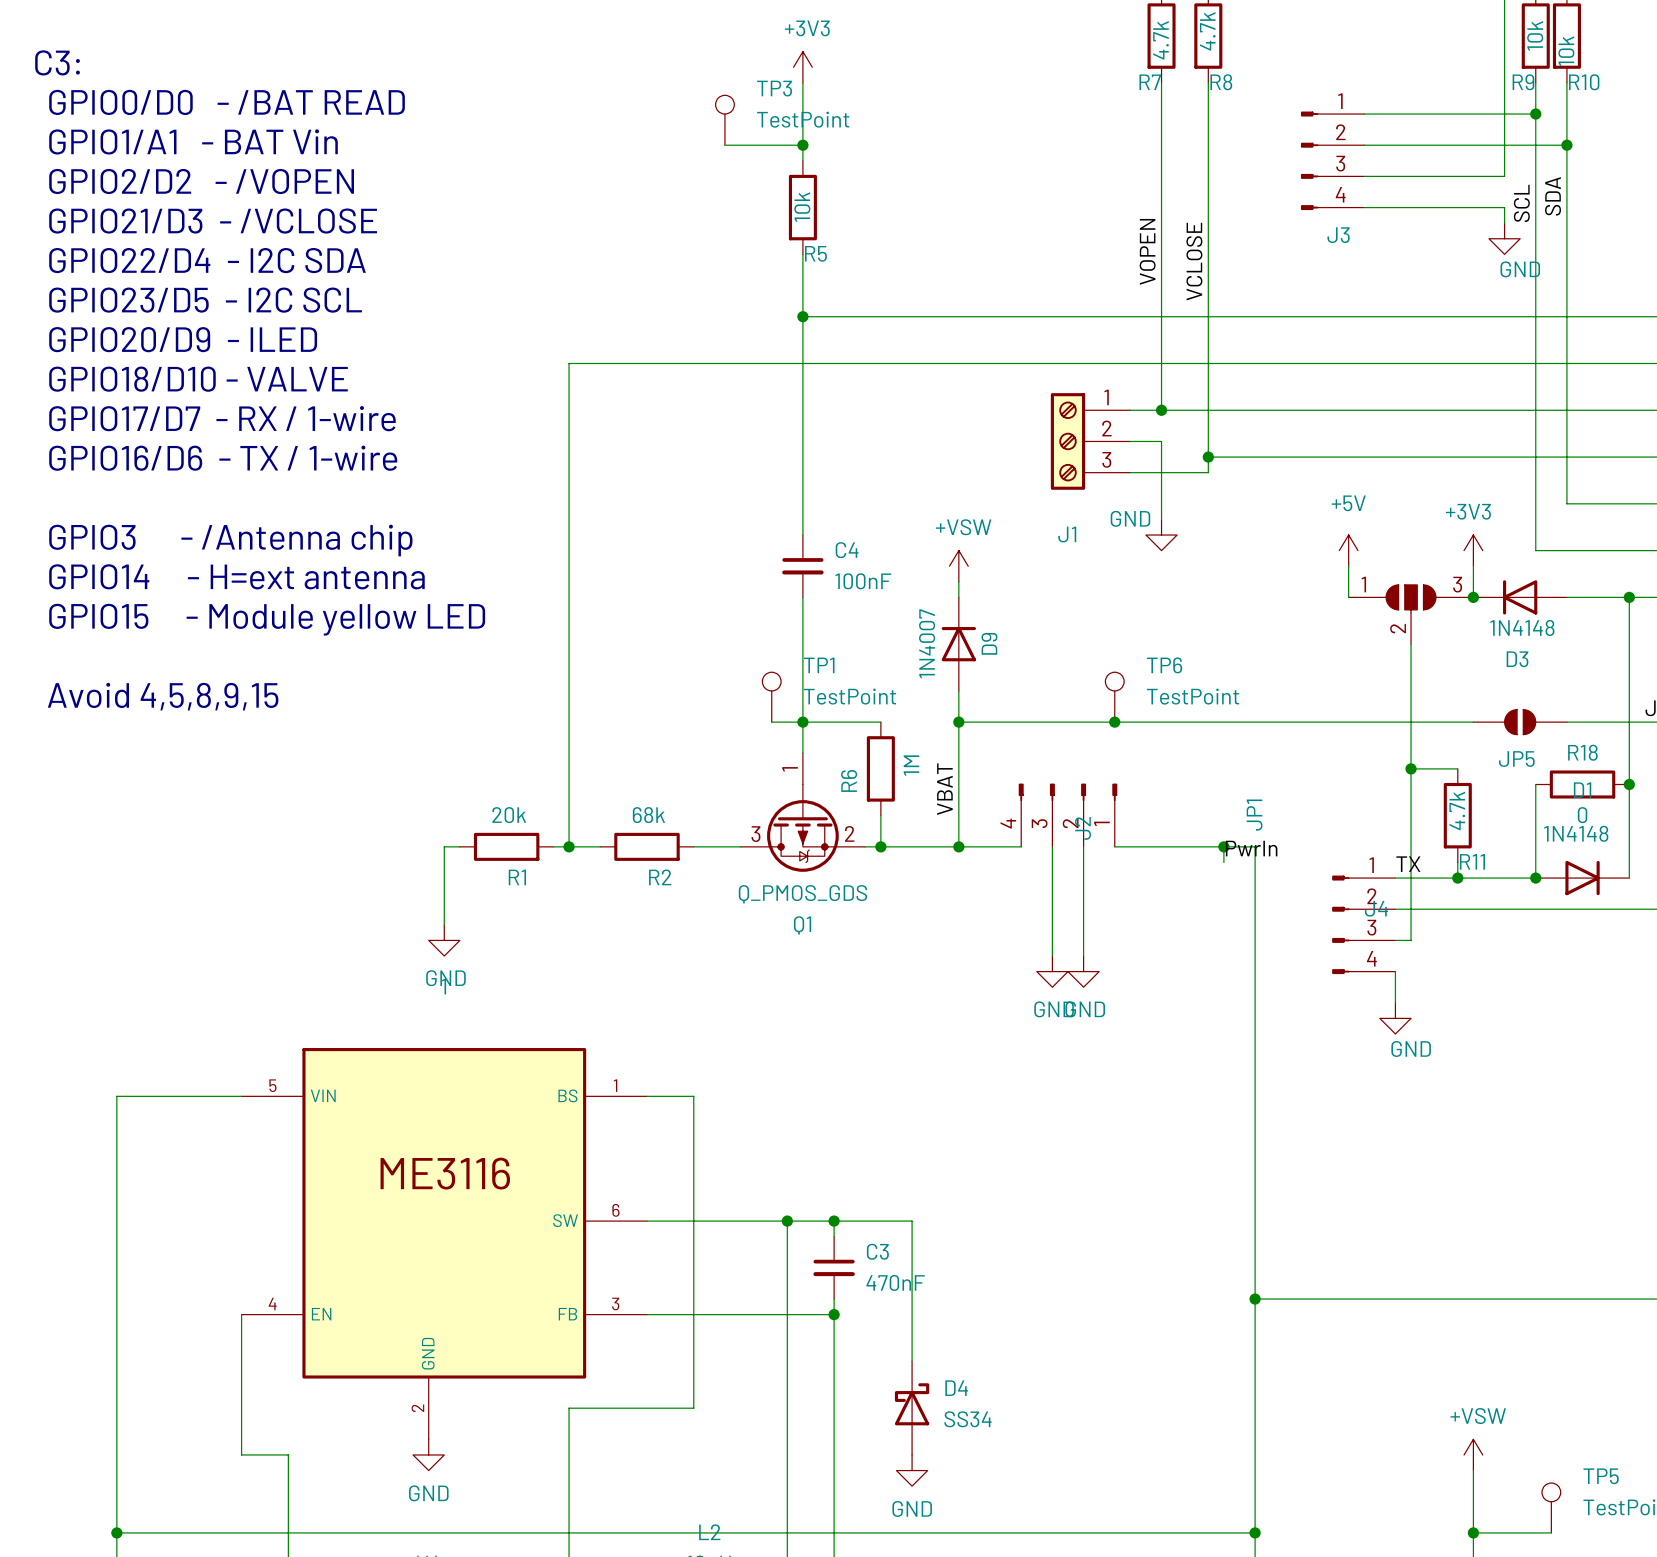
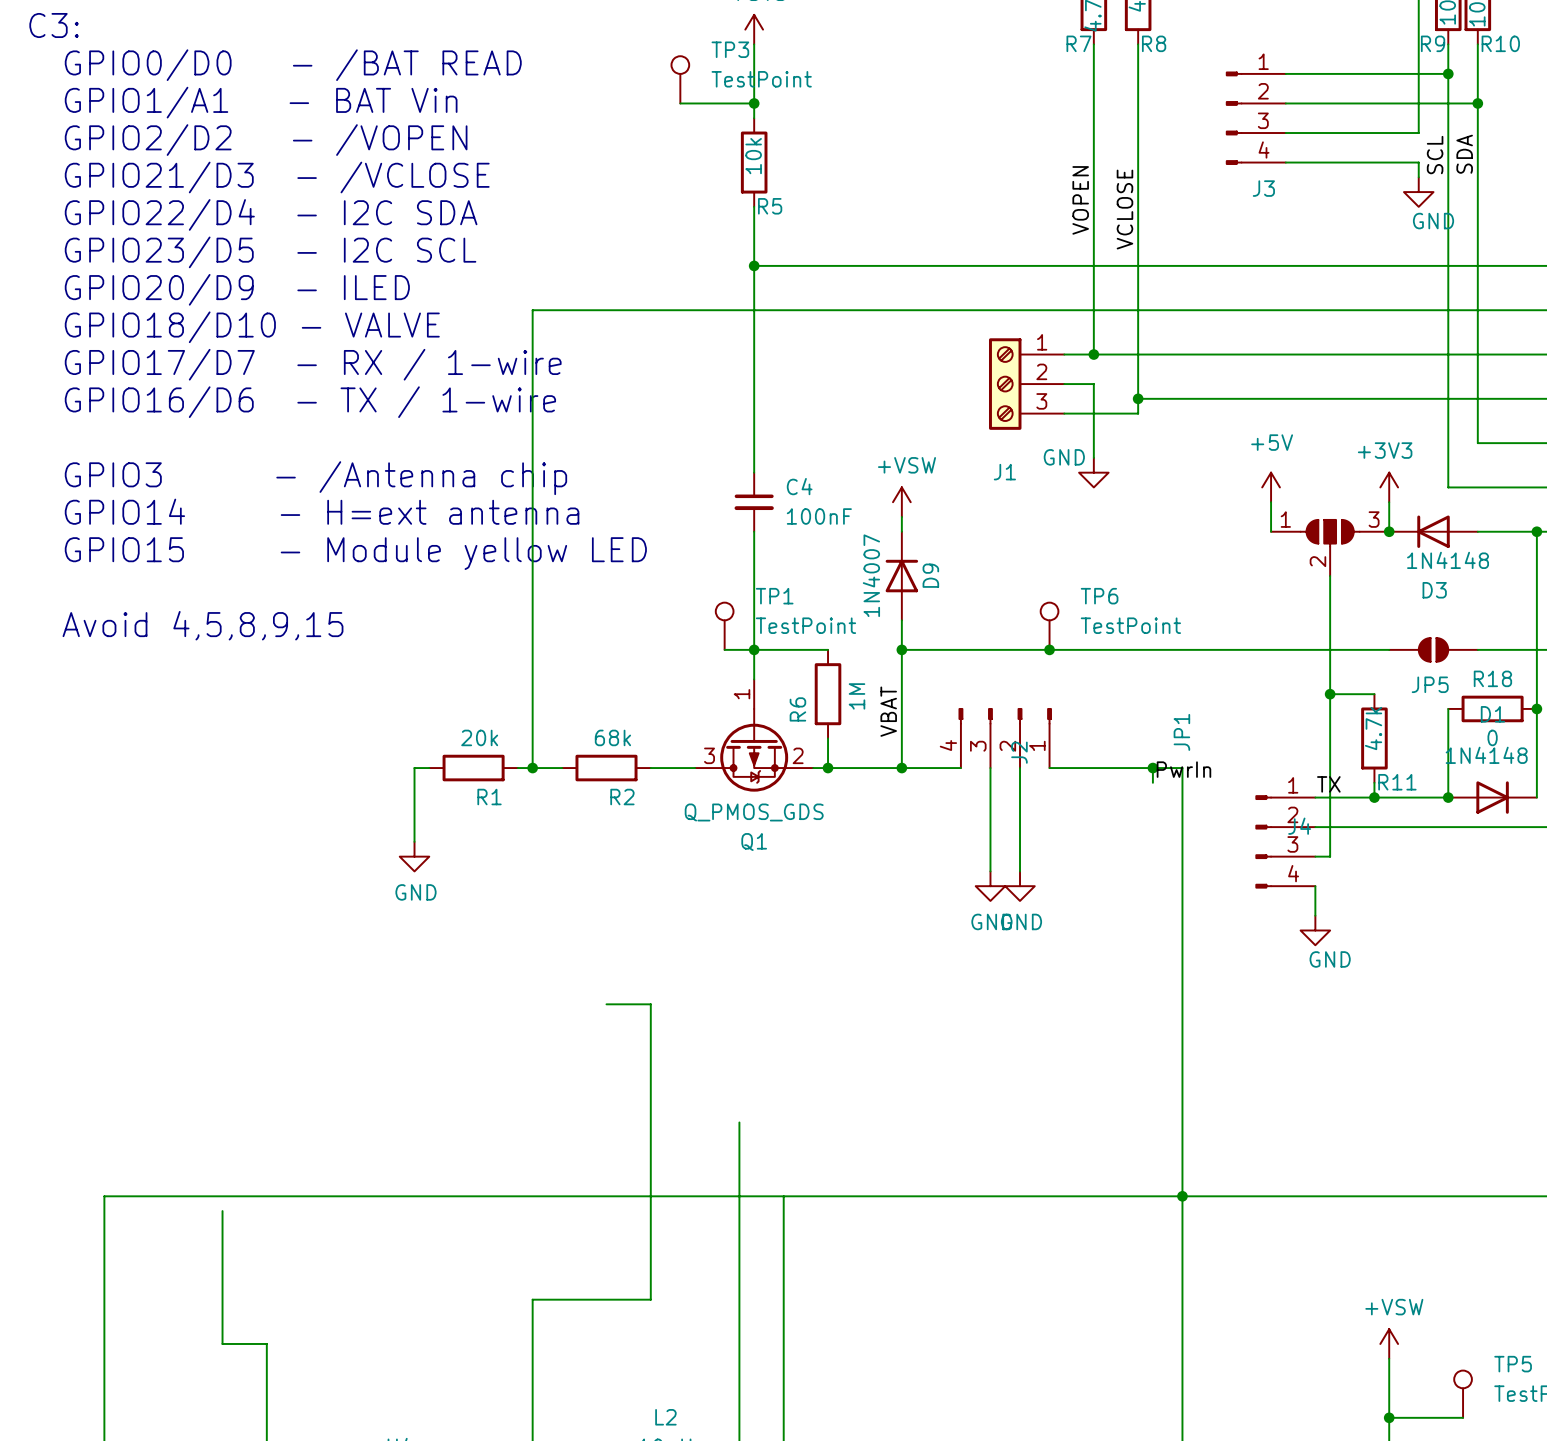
wire: (241, 1096) (116, 1096) (116, 1299) -> (1182, 1196) (104, 1196)
wire: (646, 1221) (912, 1221) (912, 1361) -> none
junction: (787, 1221) -> none
wire: (834, 1221) (834, 1236) -> none
junction: (834, 1221) -> none
1: (444, 1243) -> none
C3: 470nF (834, 1267) -> none
wire: (646, 1314) (834, 1314) -> none
junction: (834, 1314) -> none
D4: SS34 (912, 1408) -> none
power symbol: GND (428, 1454) -> none
power symbol: GND (912, 1470) -> none
wire: (116, 1532) (1255, 1532) -> none
junction: (116, 1532) -> none
junction: (1255, 1532) -> none

